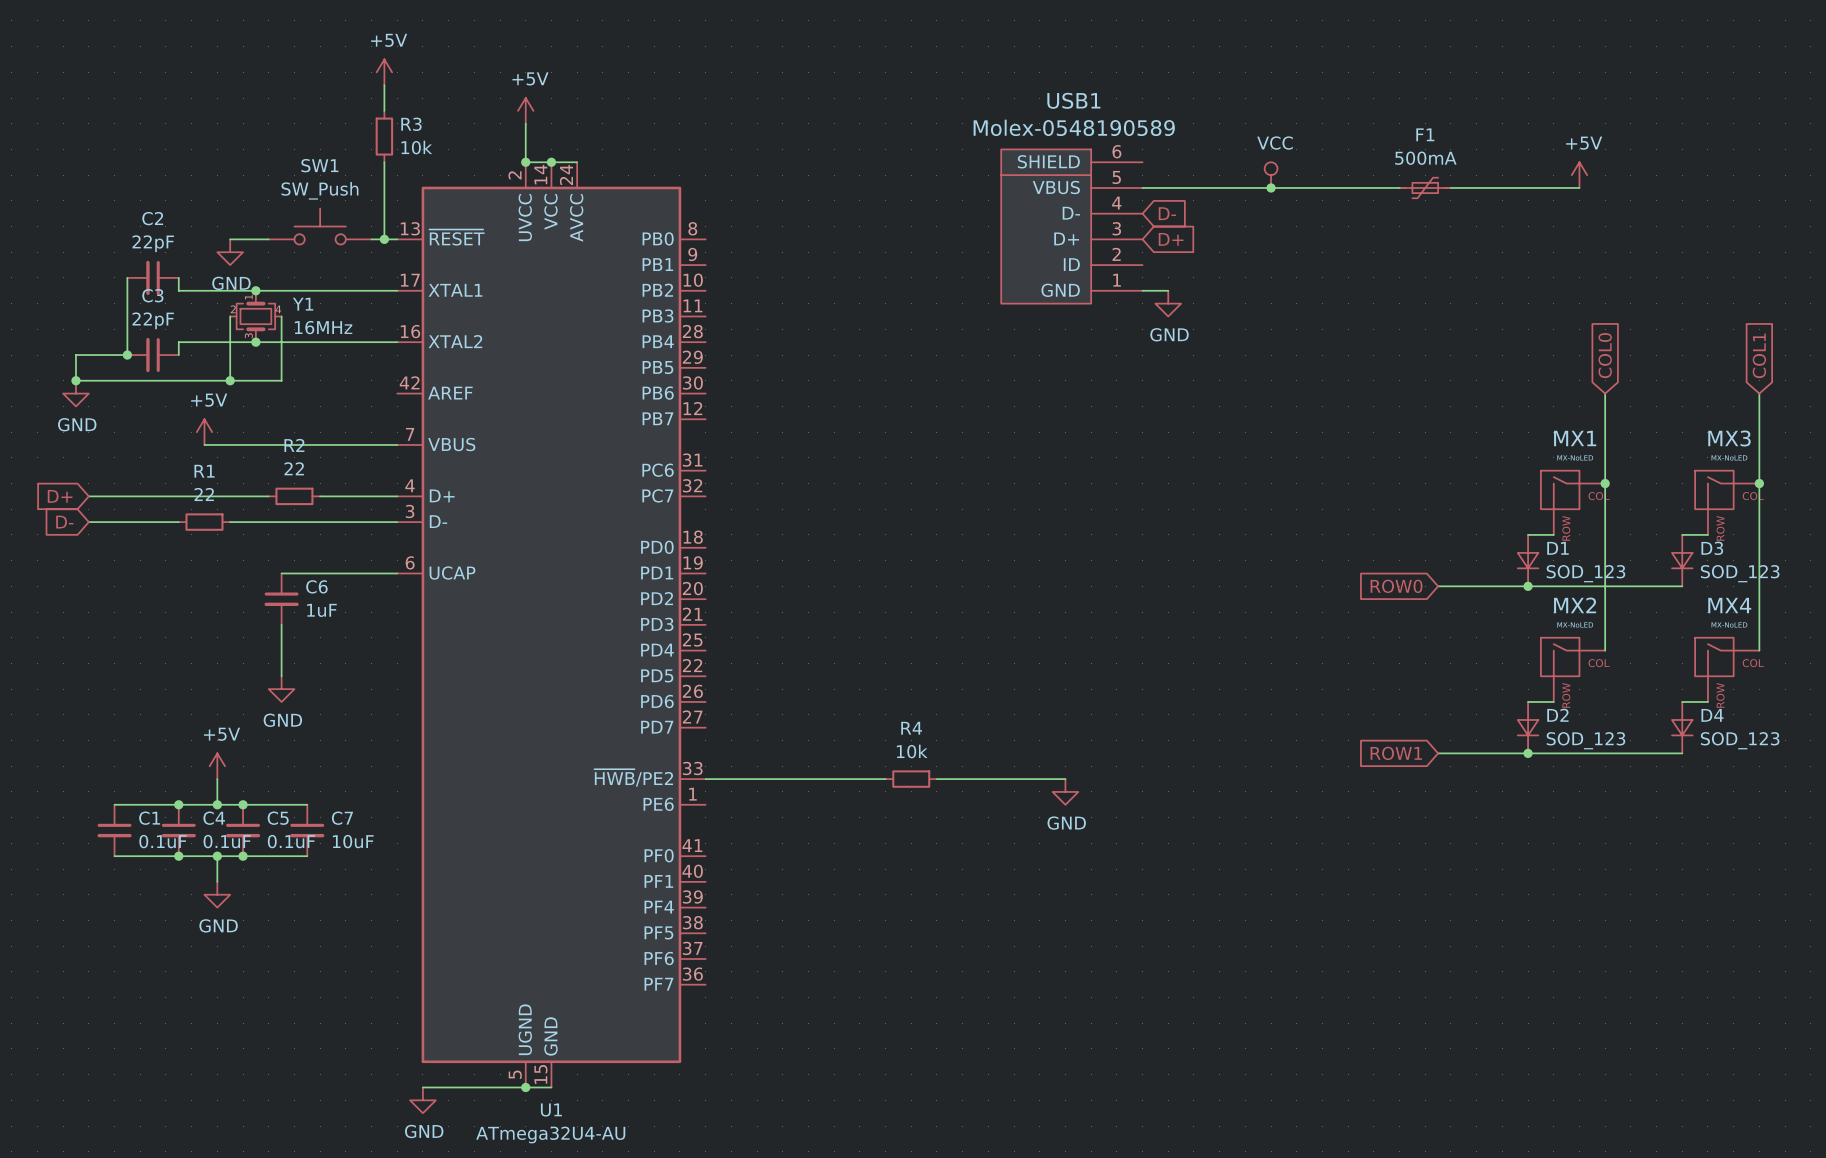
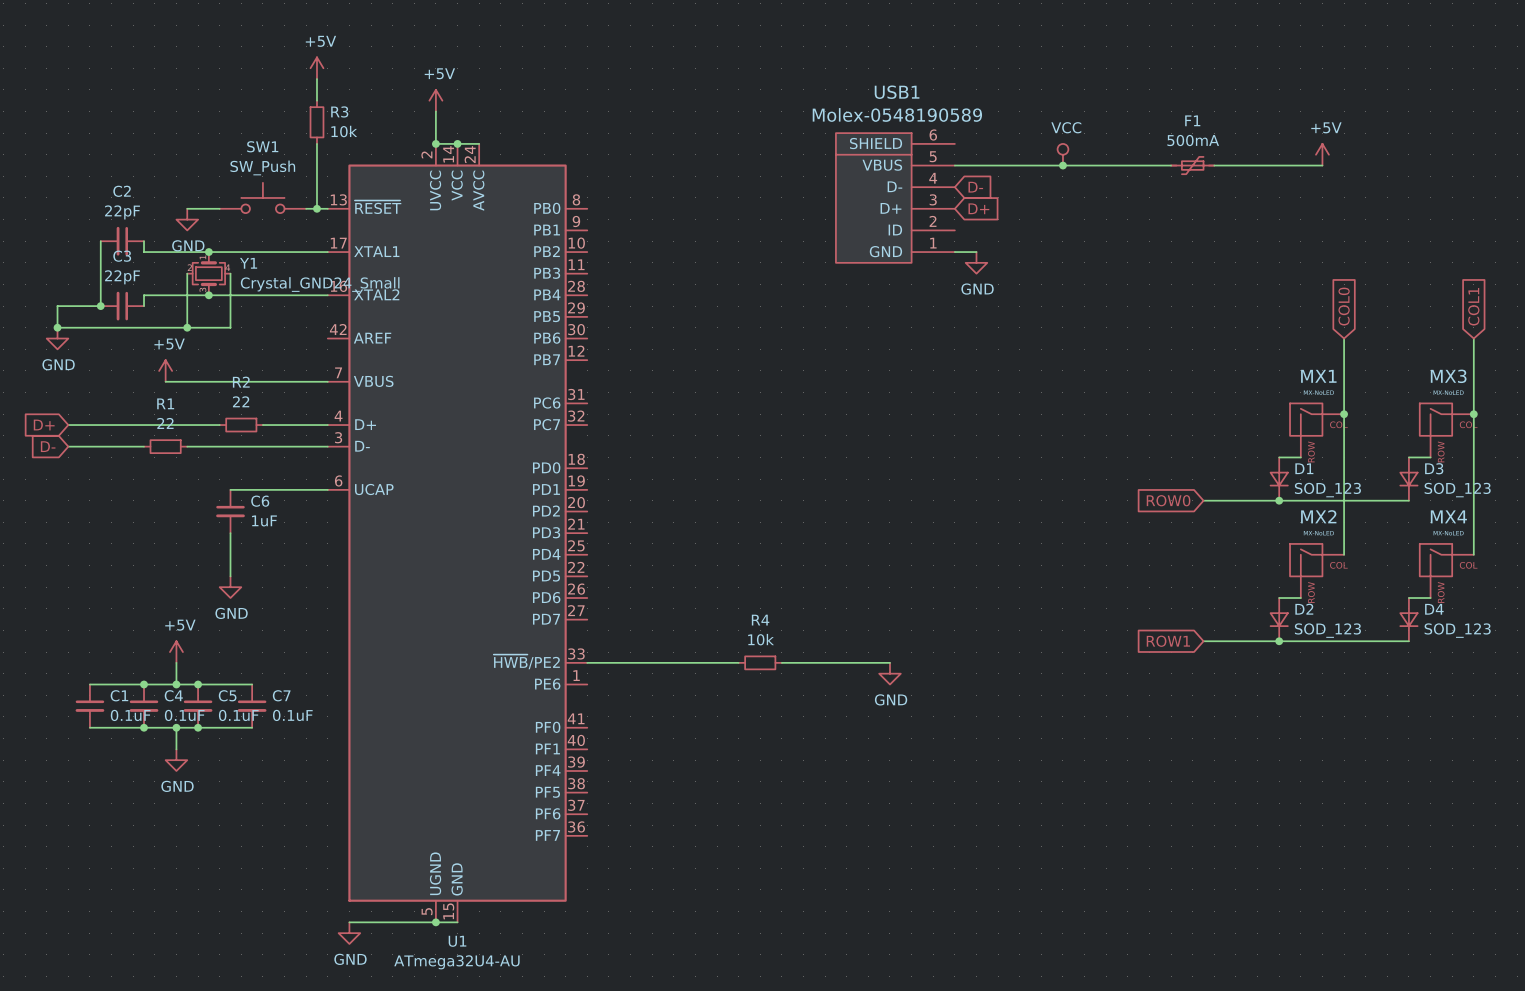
Y1 value: 16MHz (323, 327) -> Crystal_GND24_Small (320, 284)
C7 value: 10uF (353, 841) -> 0.1uF (292, 715)

